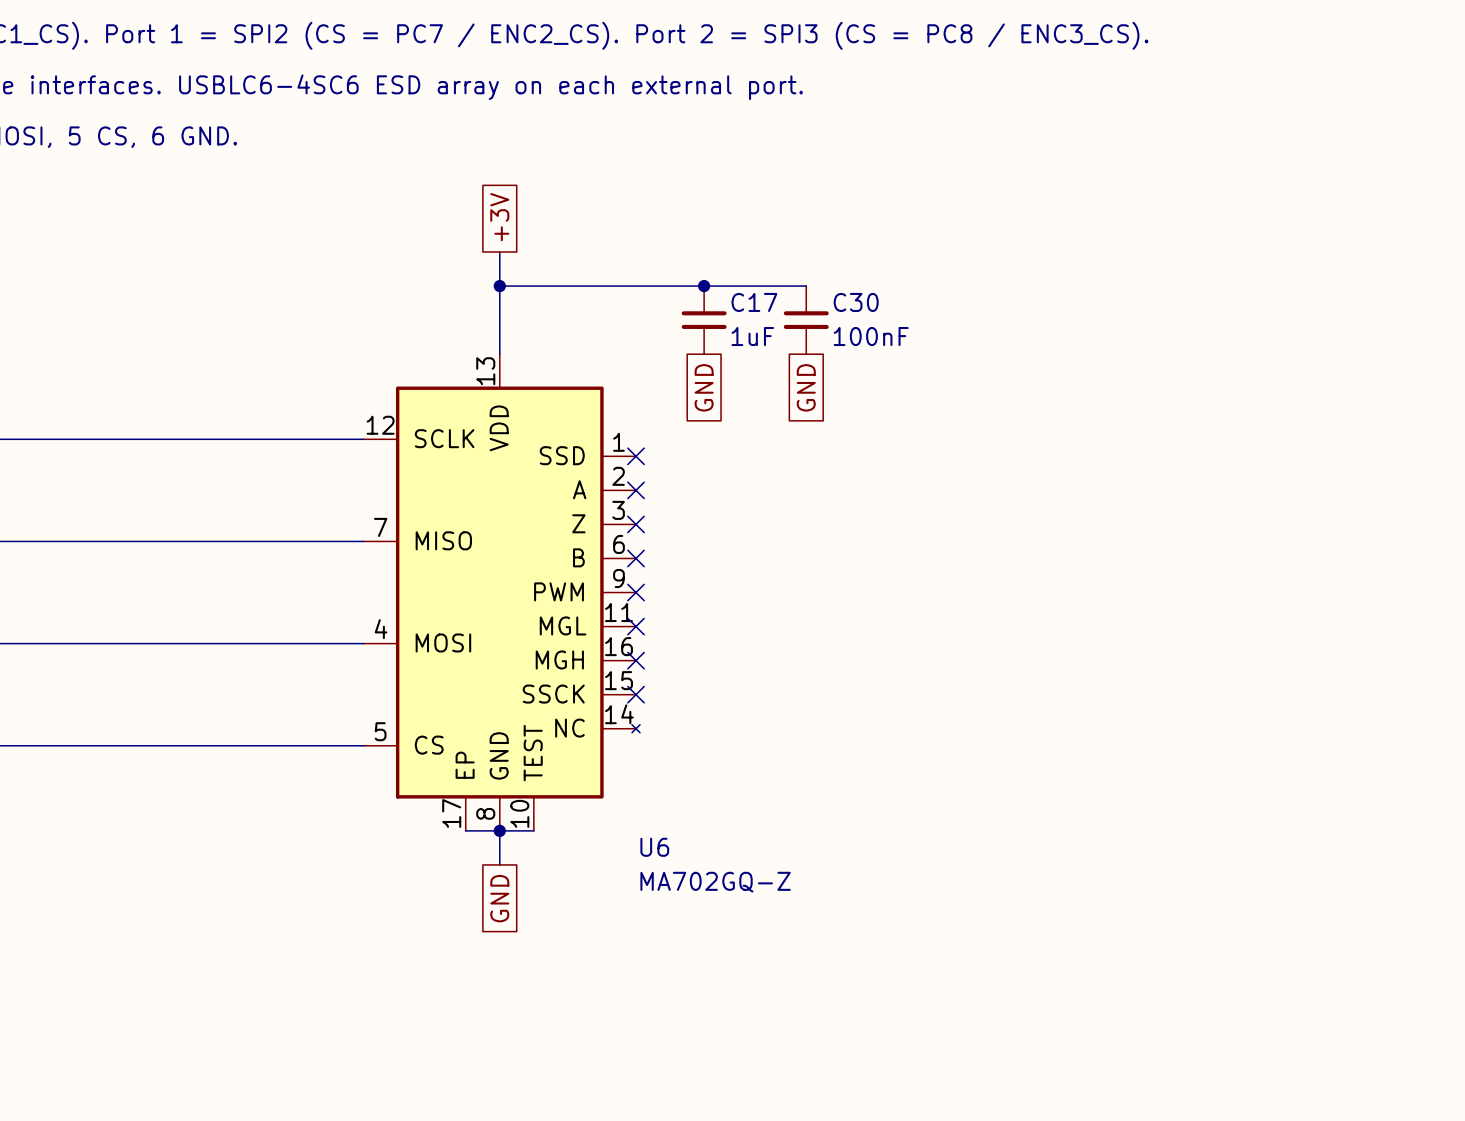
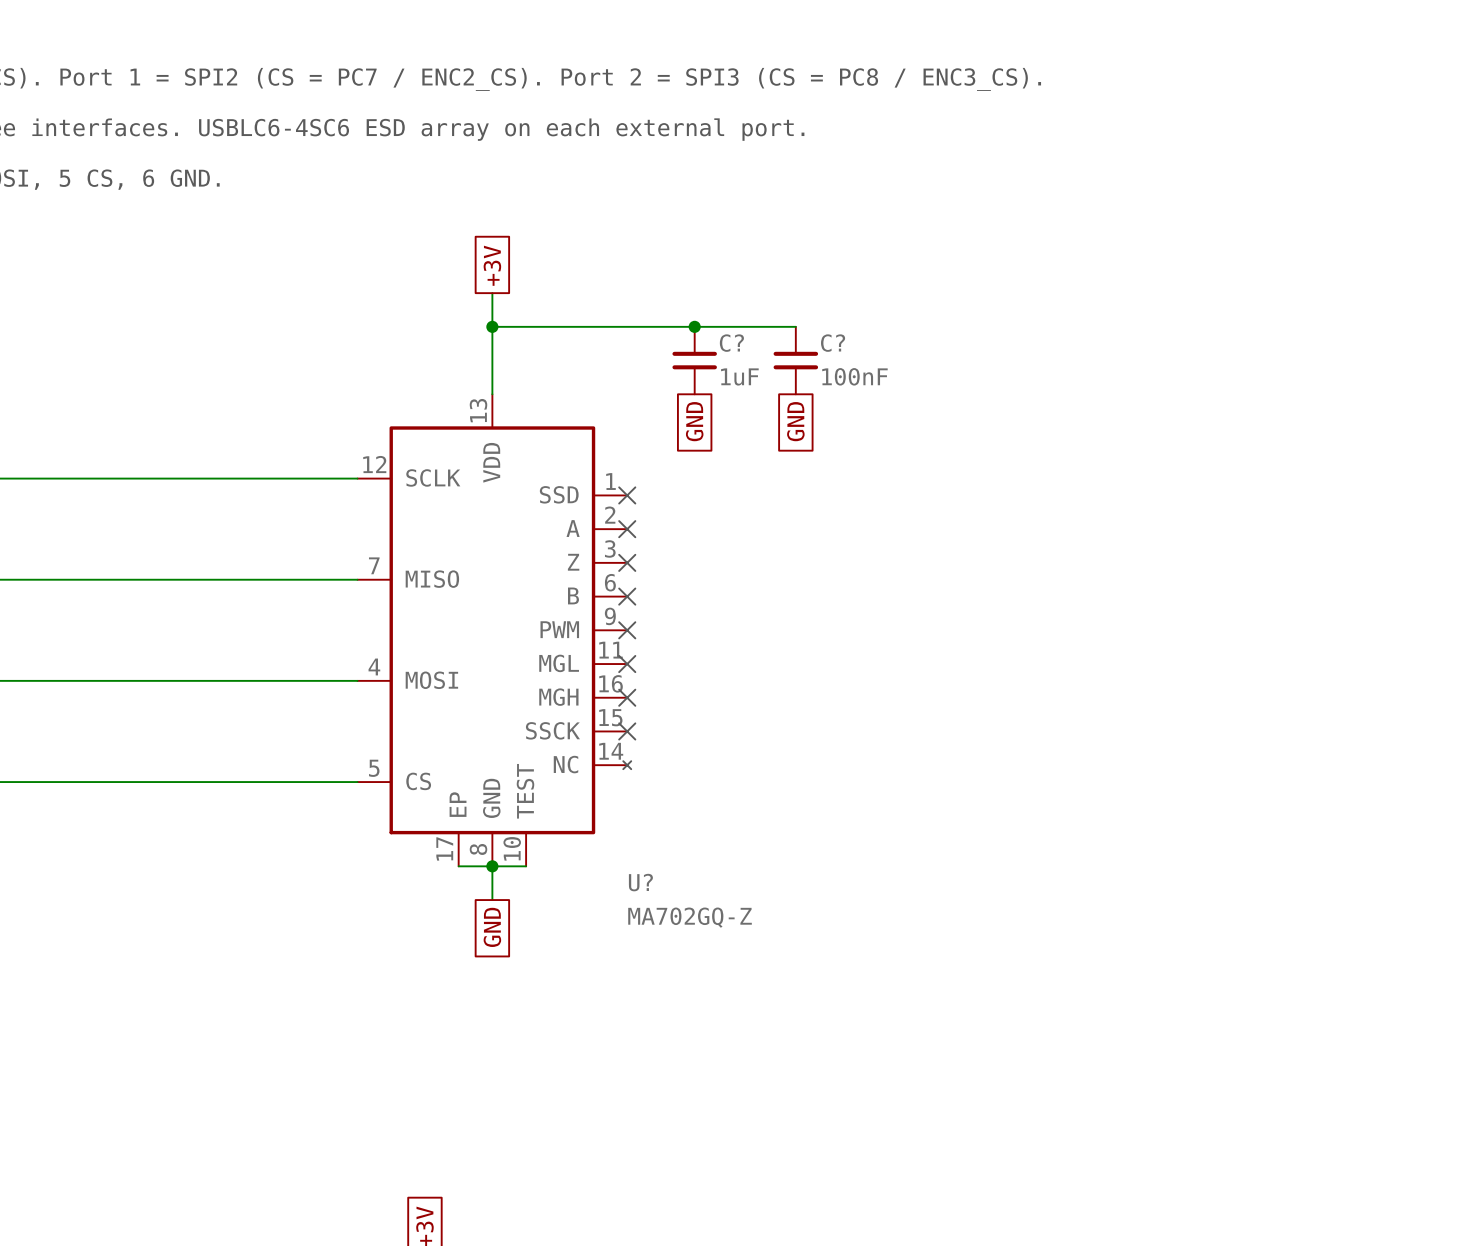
C17 name: C17 (754, 302) -> C? (731, 343)
C30 name: C30 (856, 302) -> C? (833, 343)
U6 name: U6 (654, 847) -> U? (640, 882)

